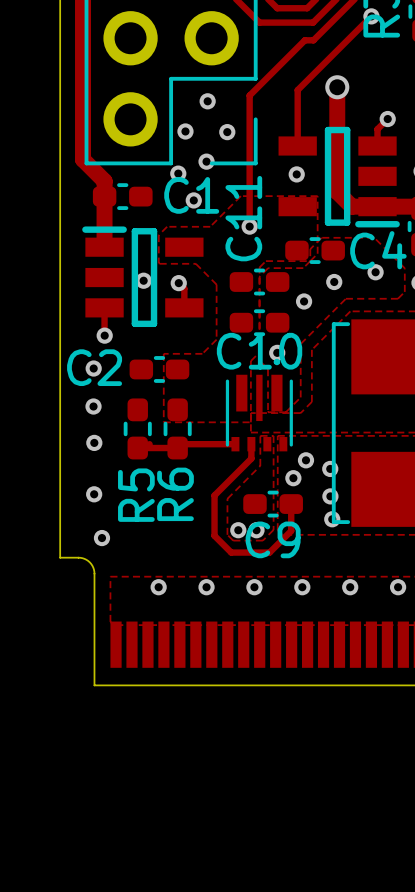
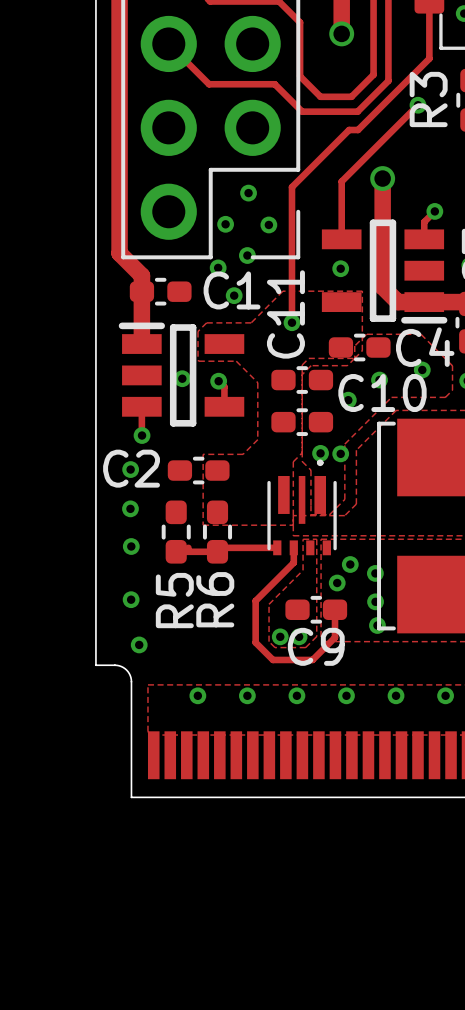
C10 name position: C10 (259, 351) -> C10 (382, 393)
via: none -> (340, 453)

